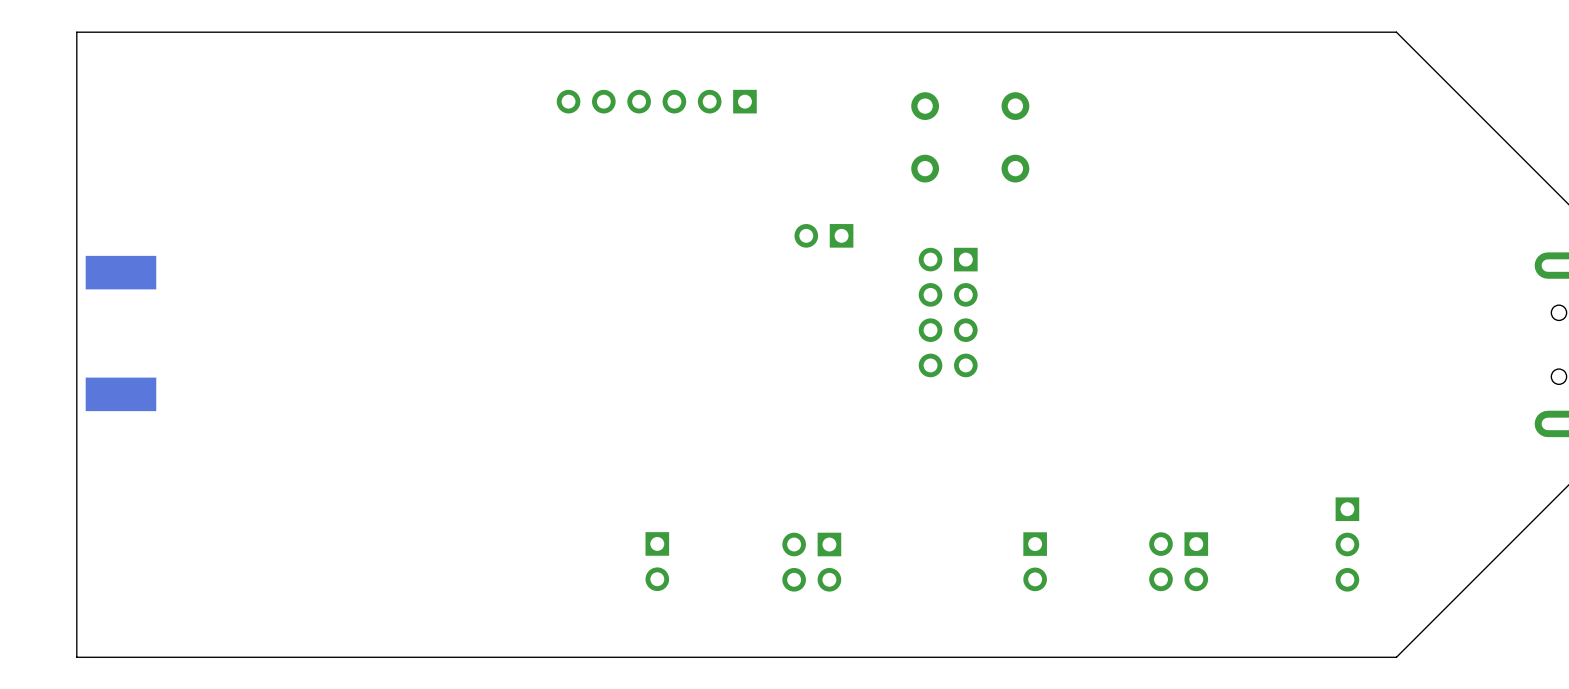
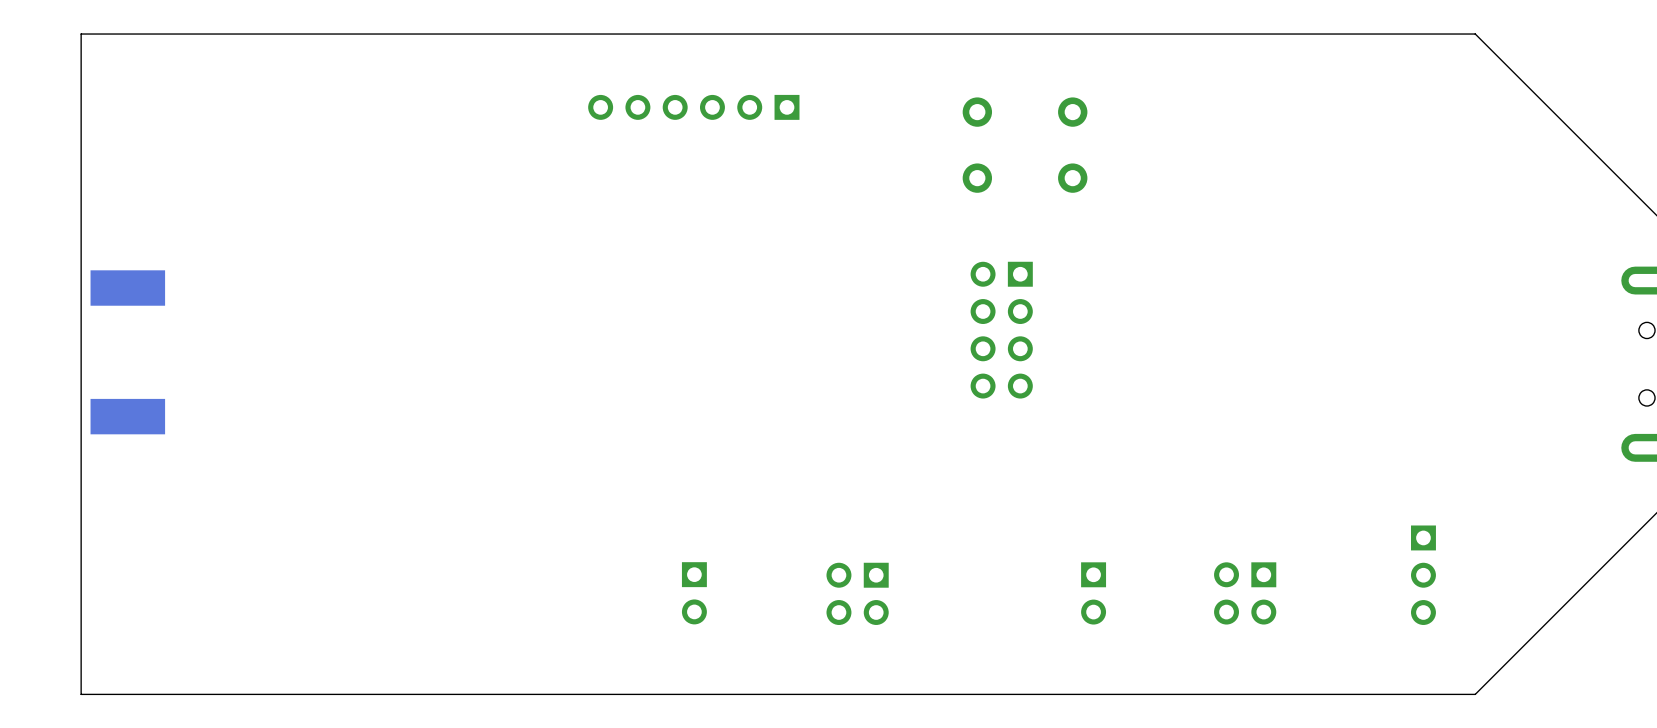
part: (823, 235) -> none

